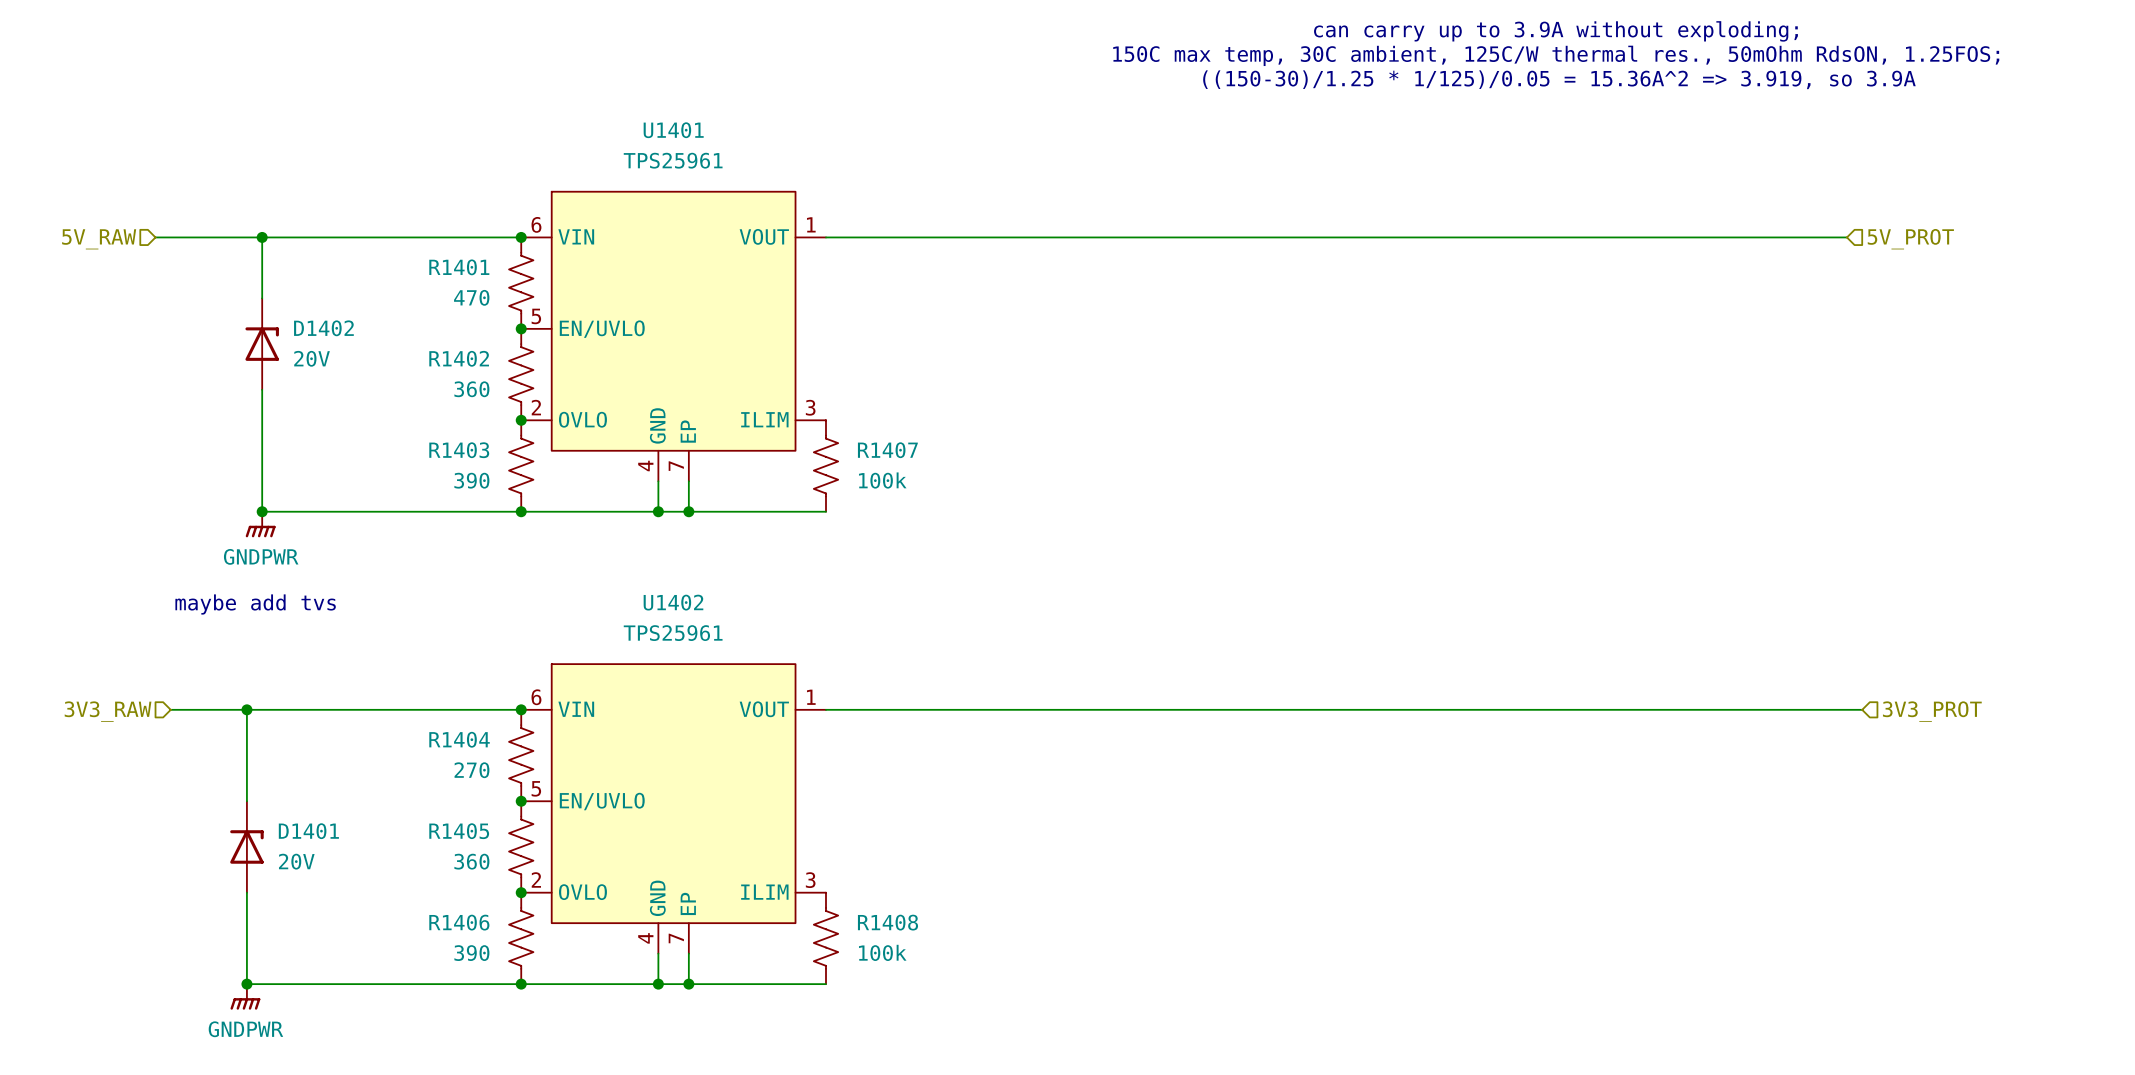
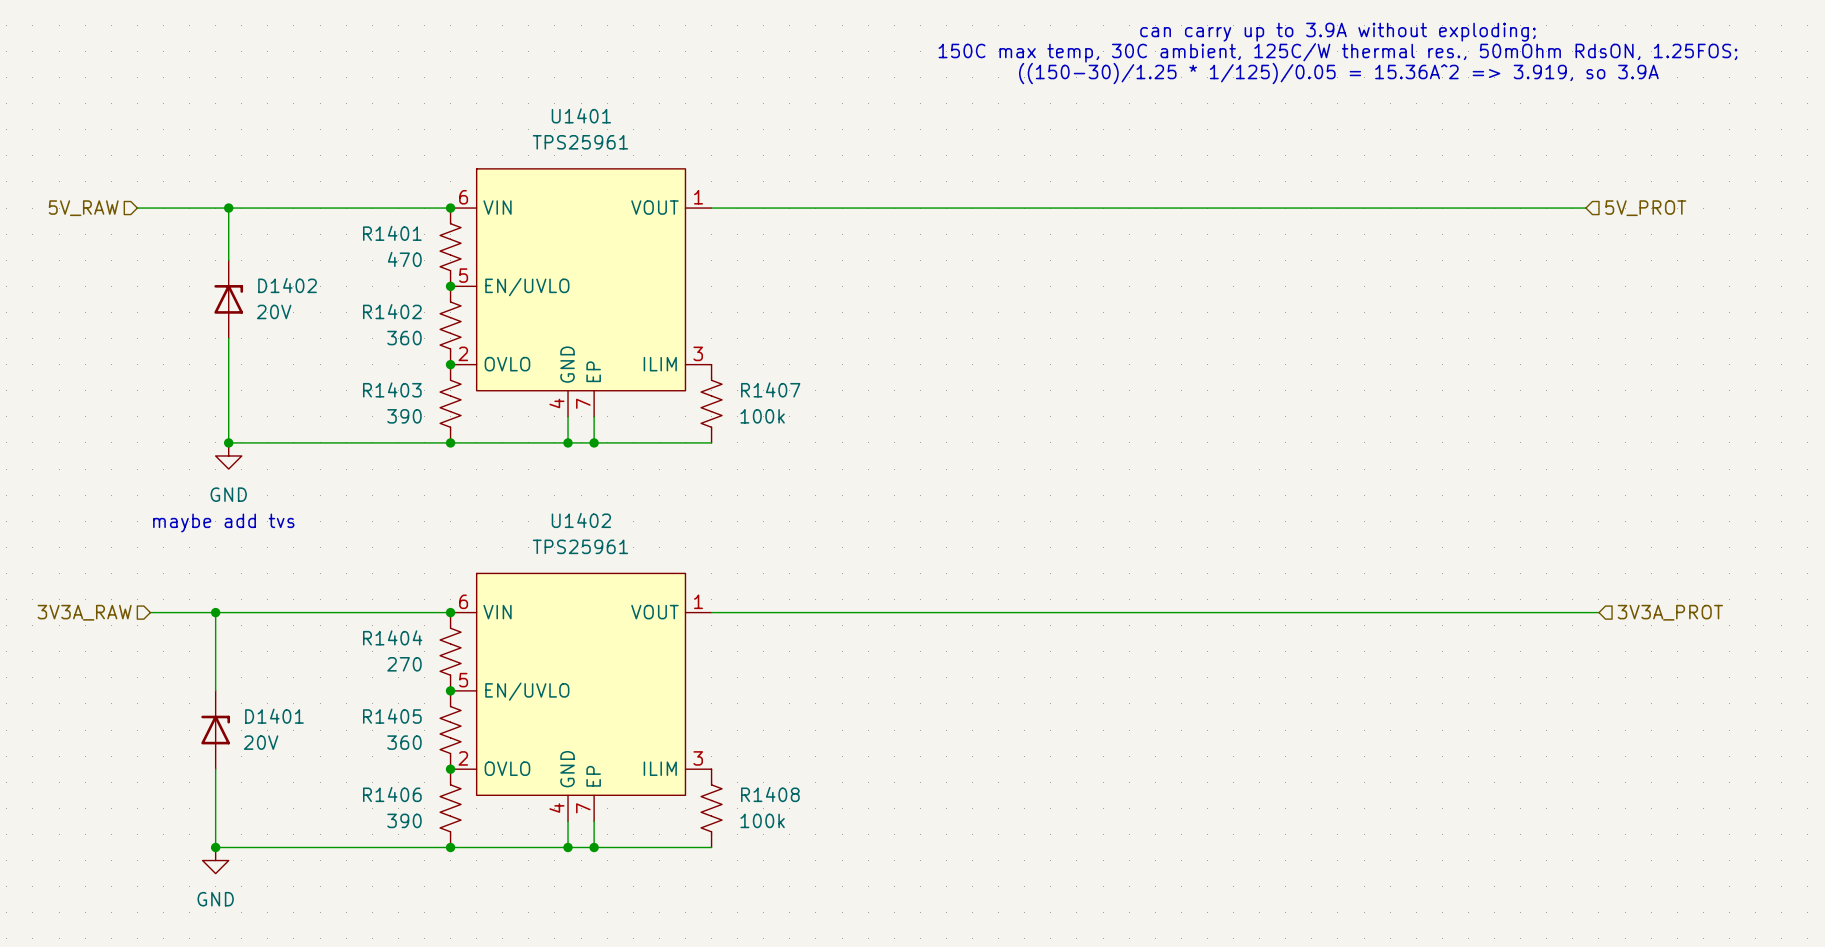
power symbol: GNDPWR (260, 524) -> GND (228, 455)
hierarchical label: 3V3_RAW (108, 711) -> 3V3A_RAW (84, 612)
hierarchical label: 3V3_PROT (1932, 711) -> 3V3A_PROT (1670, 612)
power symbol: GNDPWR (245, 996) -> GND (215, 860)

